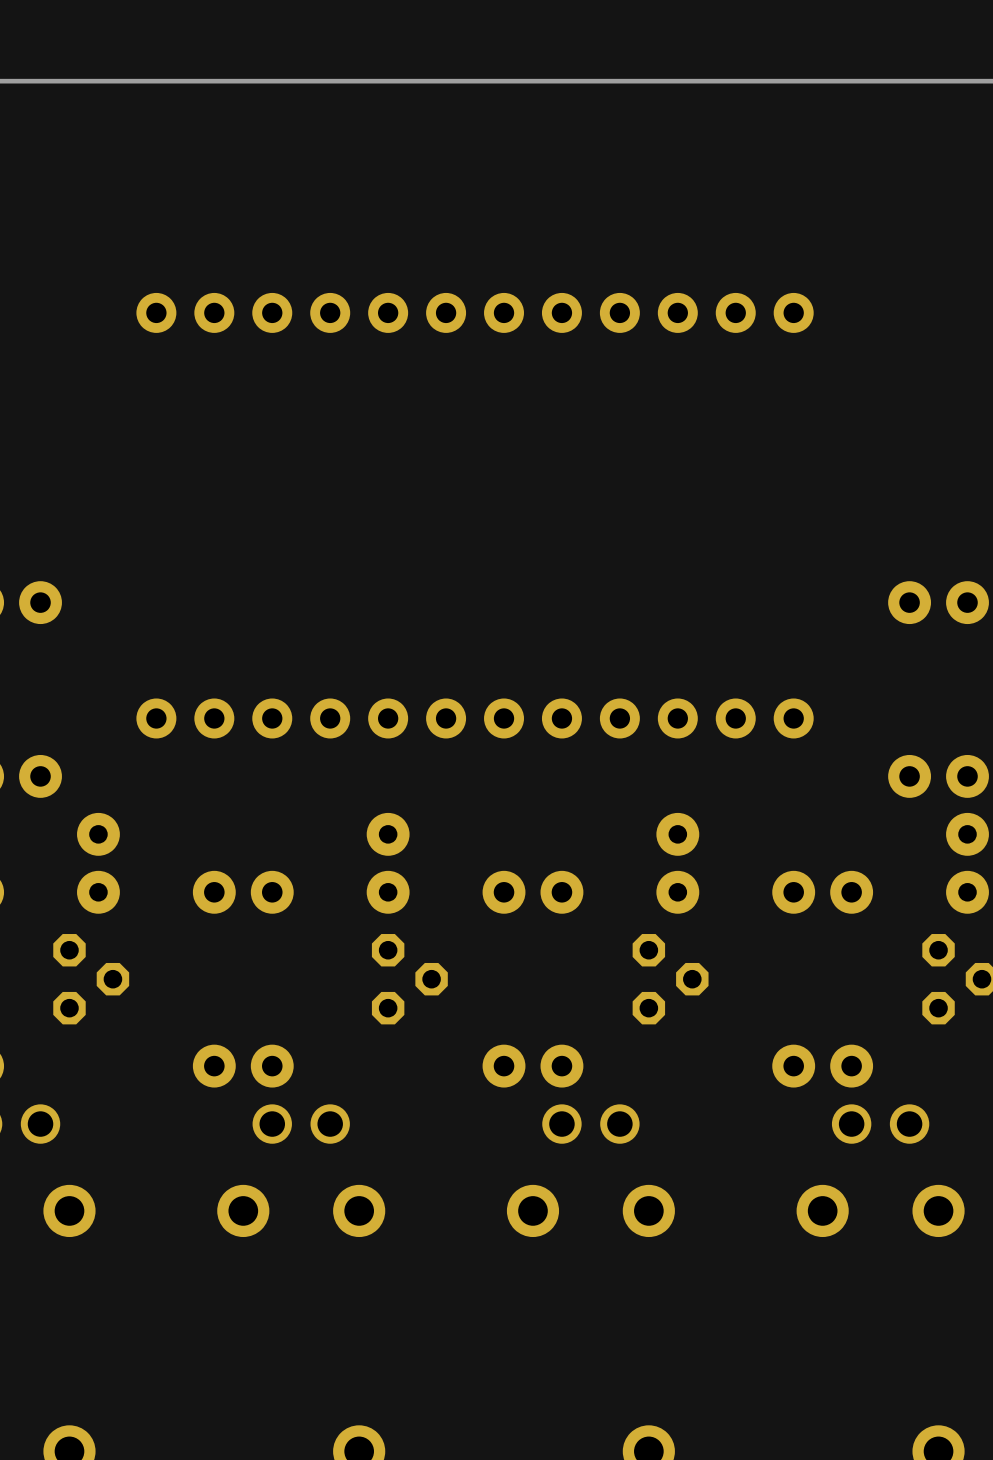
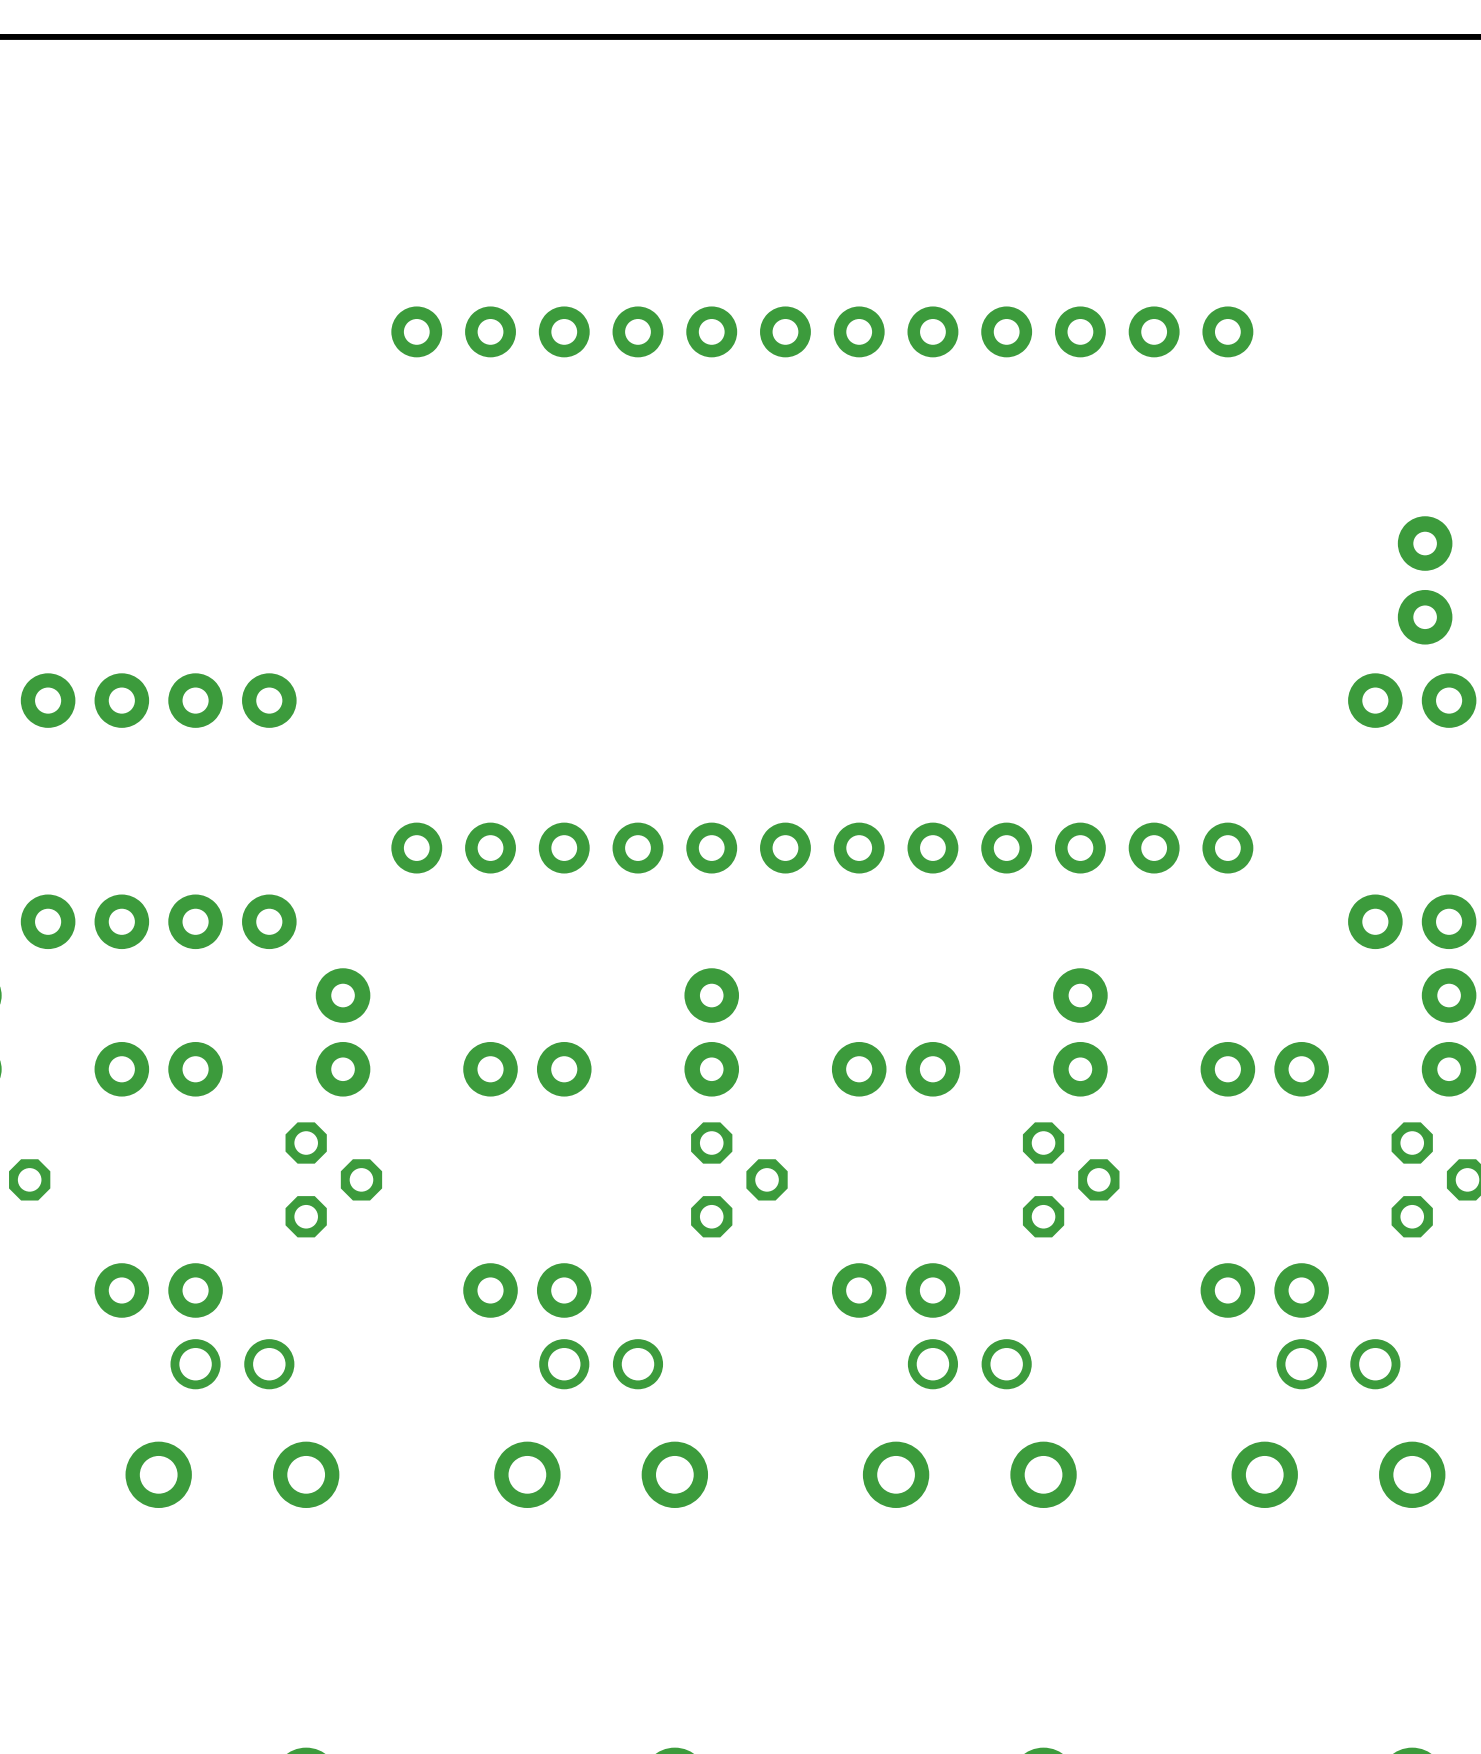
part: none -> (1425, 580)

